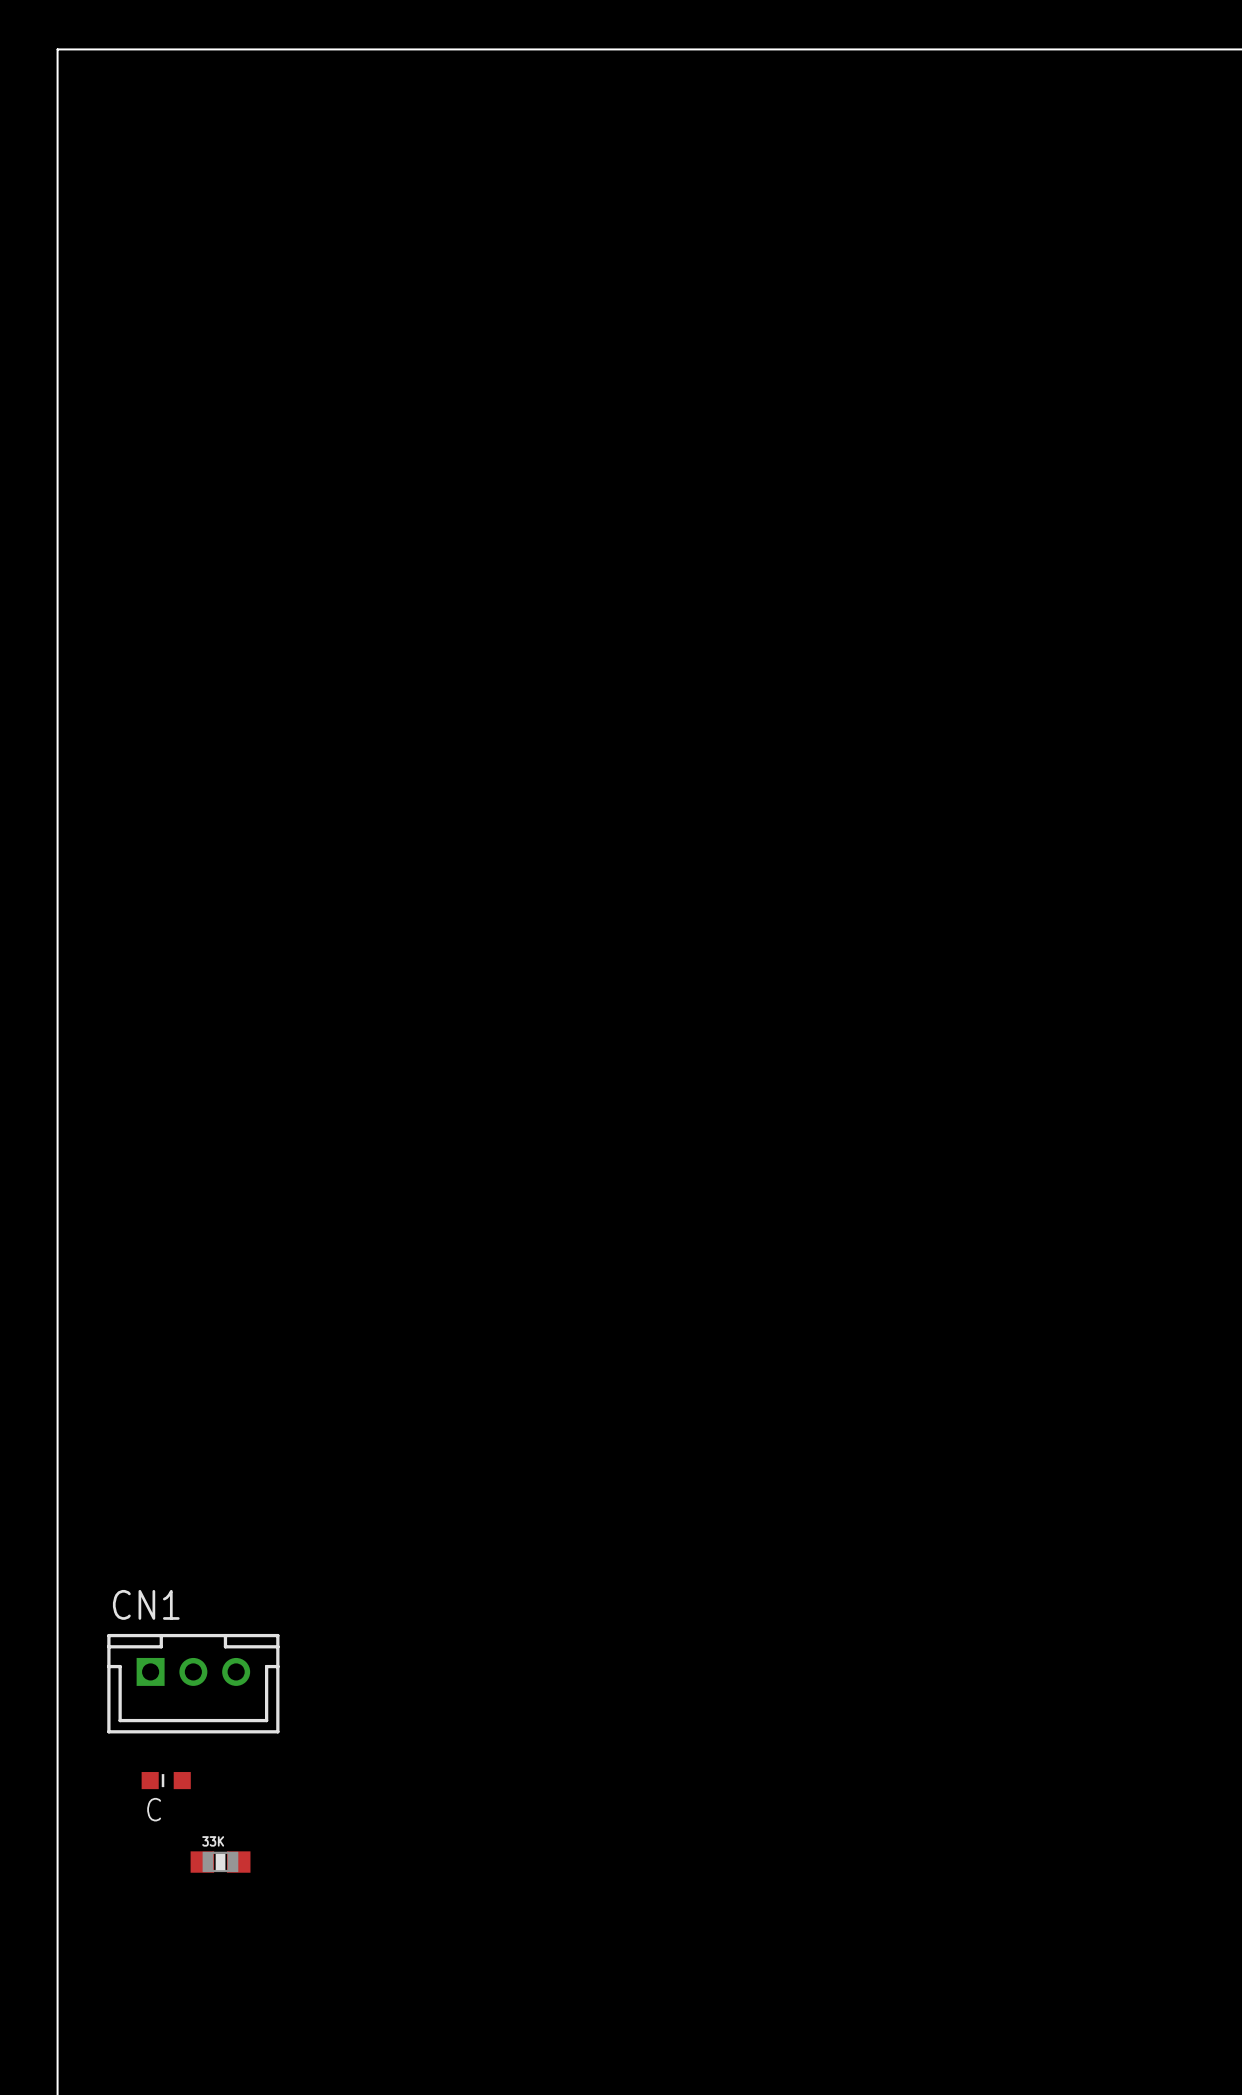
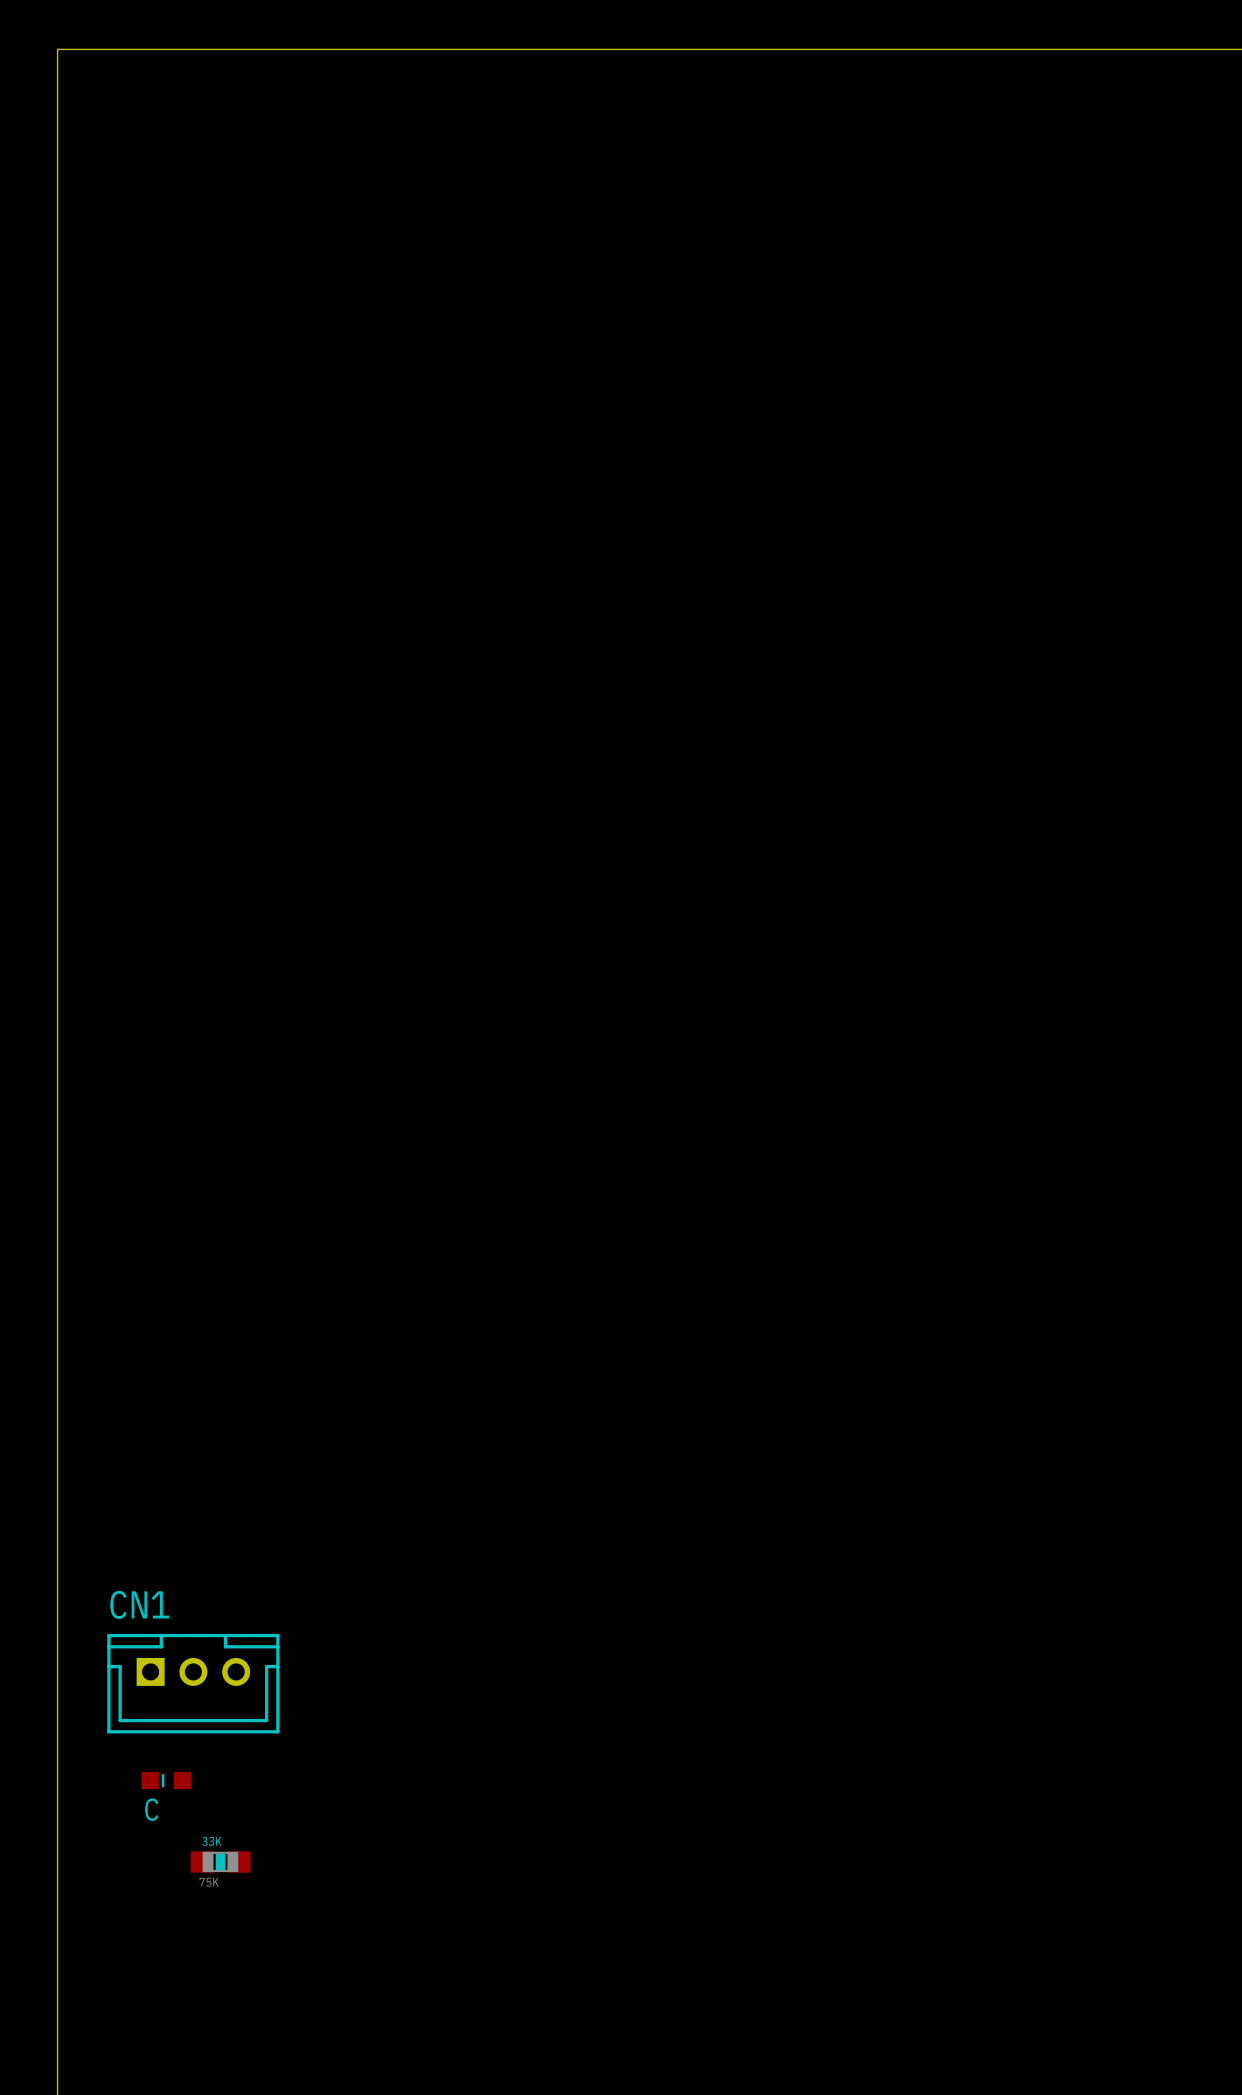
33K value: none -> 75K (209, 1882)

